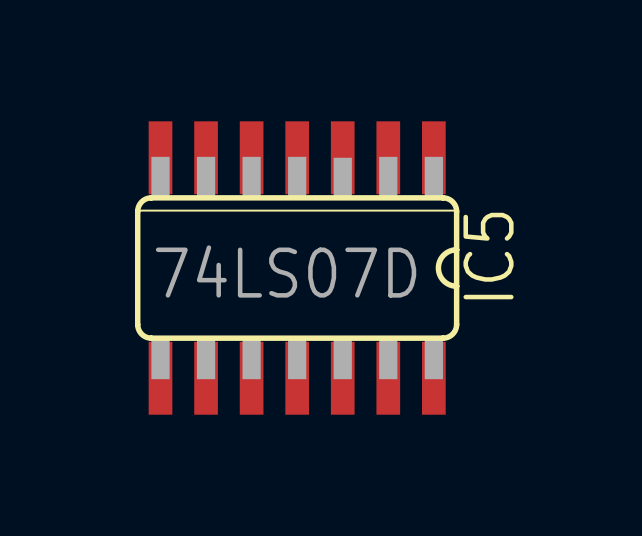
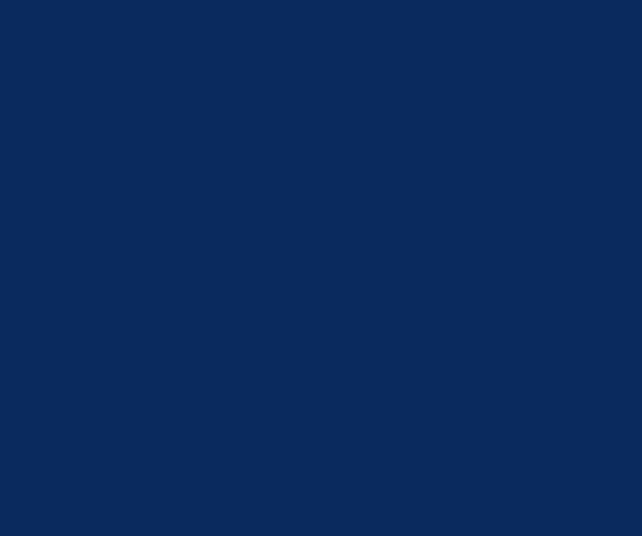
IC5: 74LS07D (297, 268) -> none

